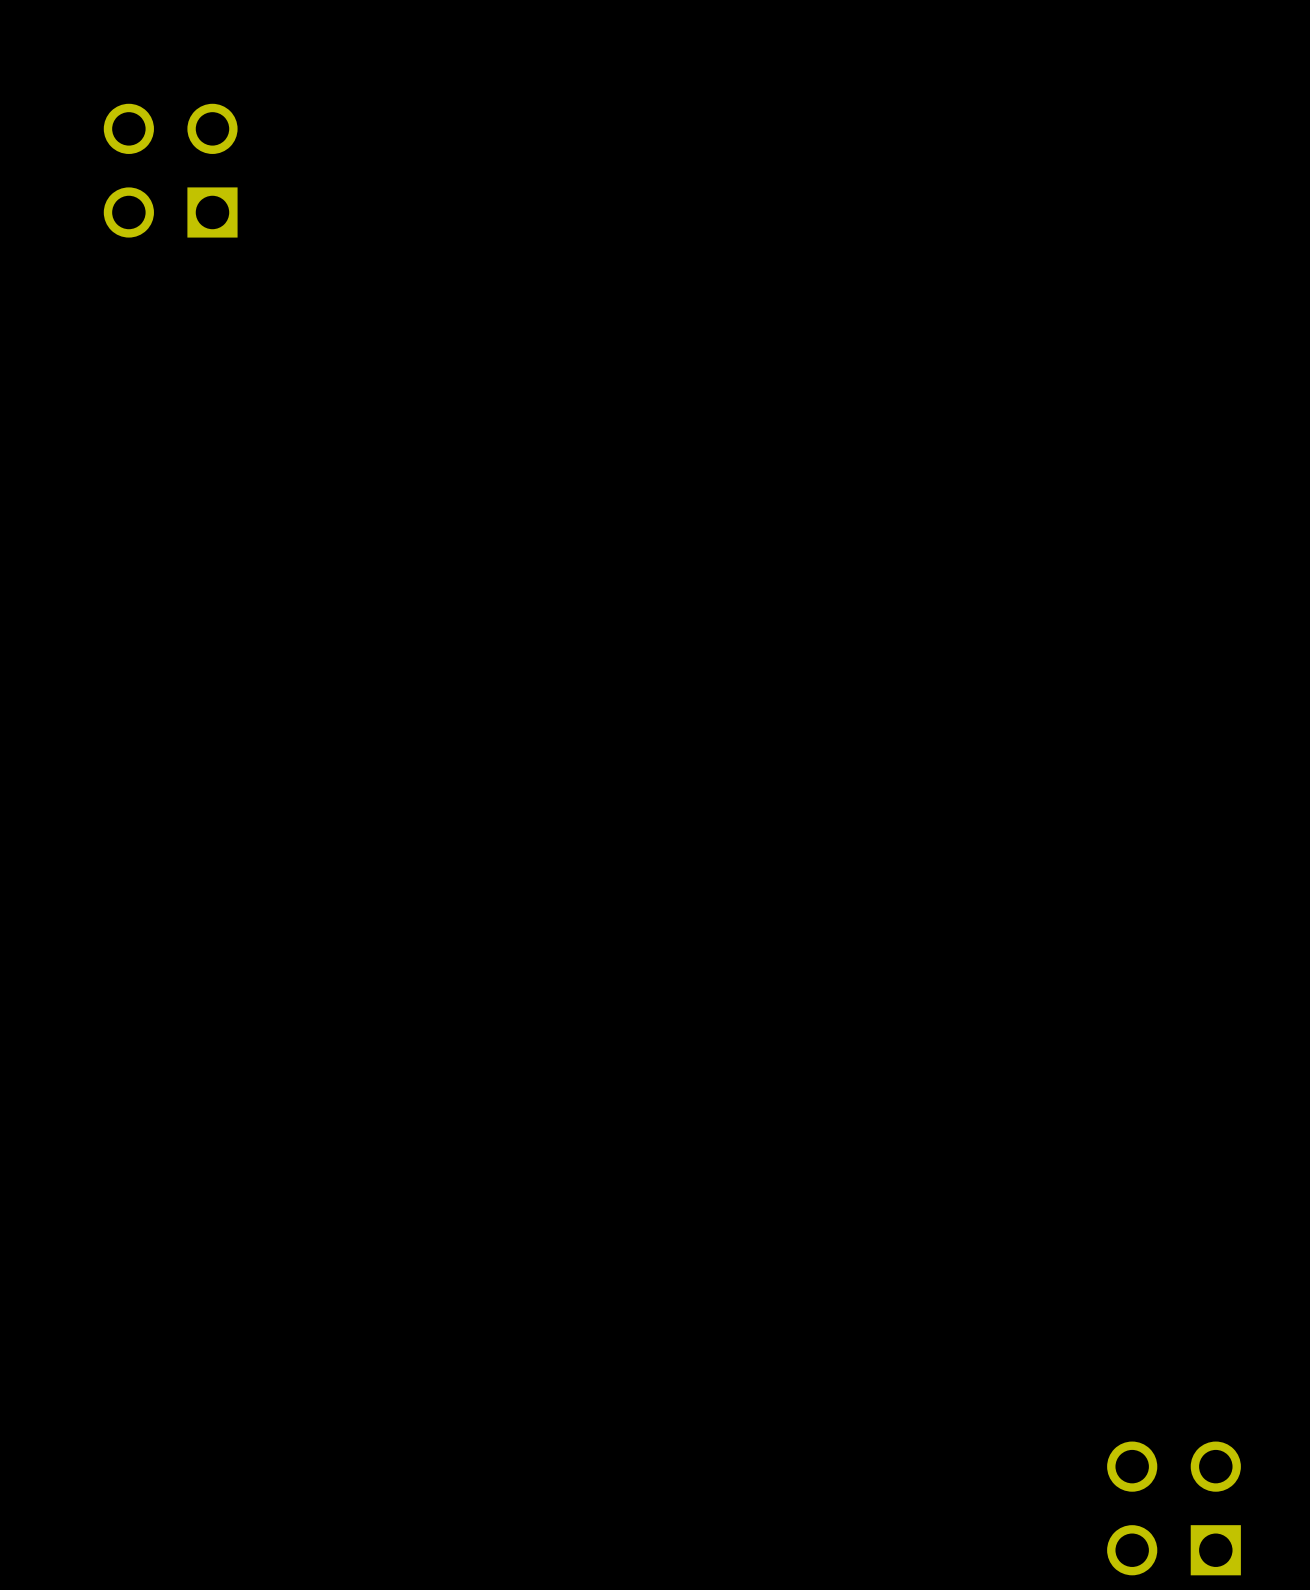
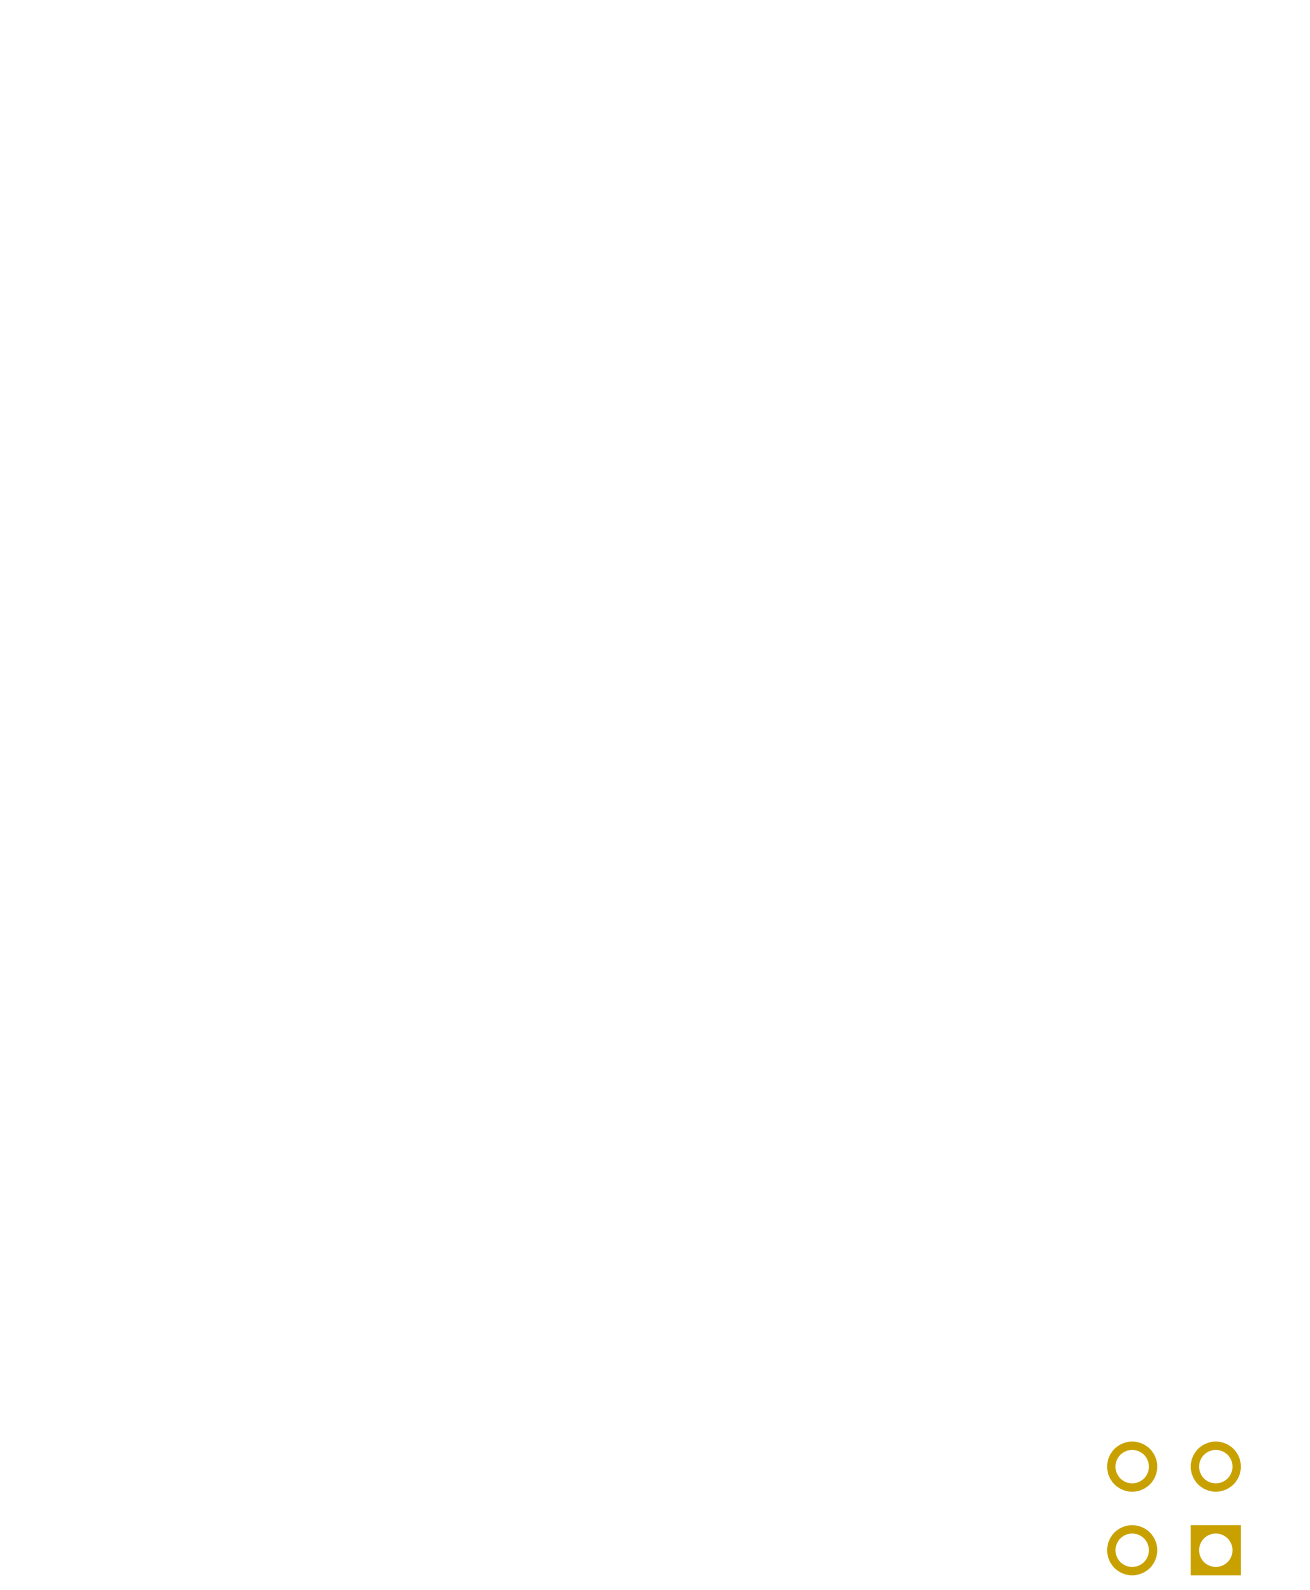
part: (170, 170) -> none

